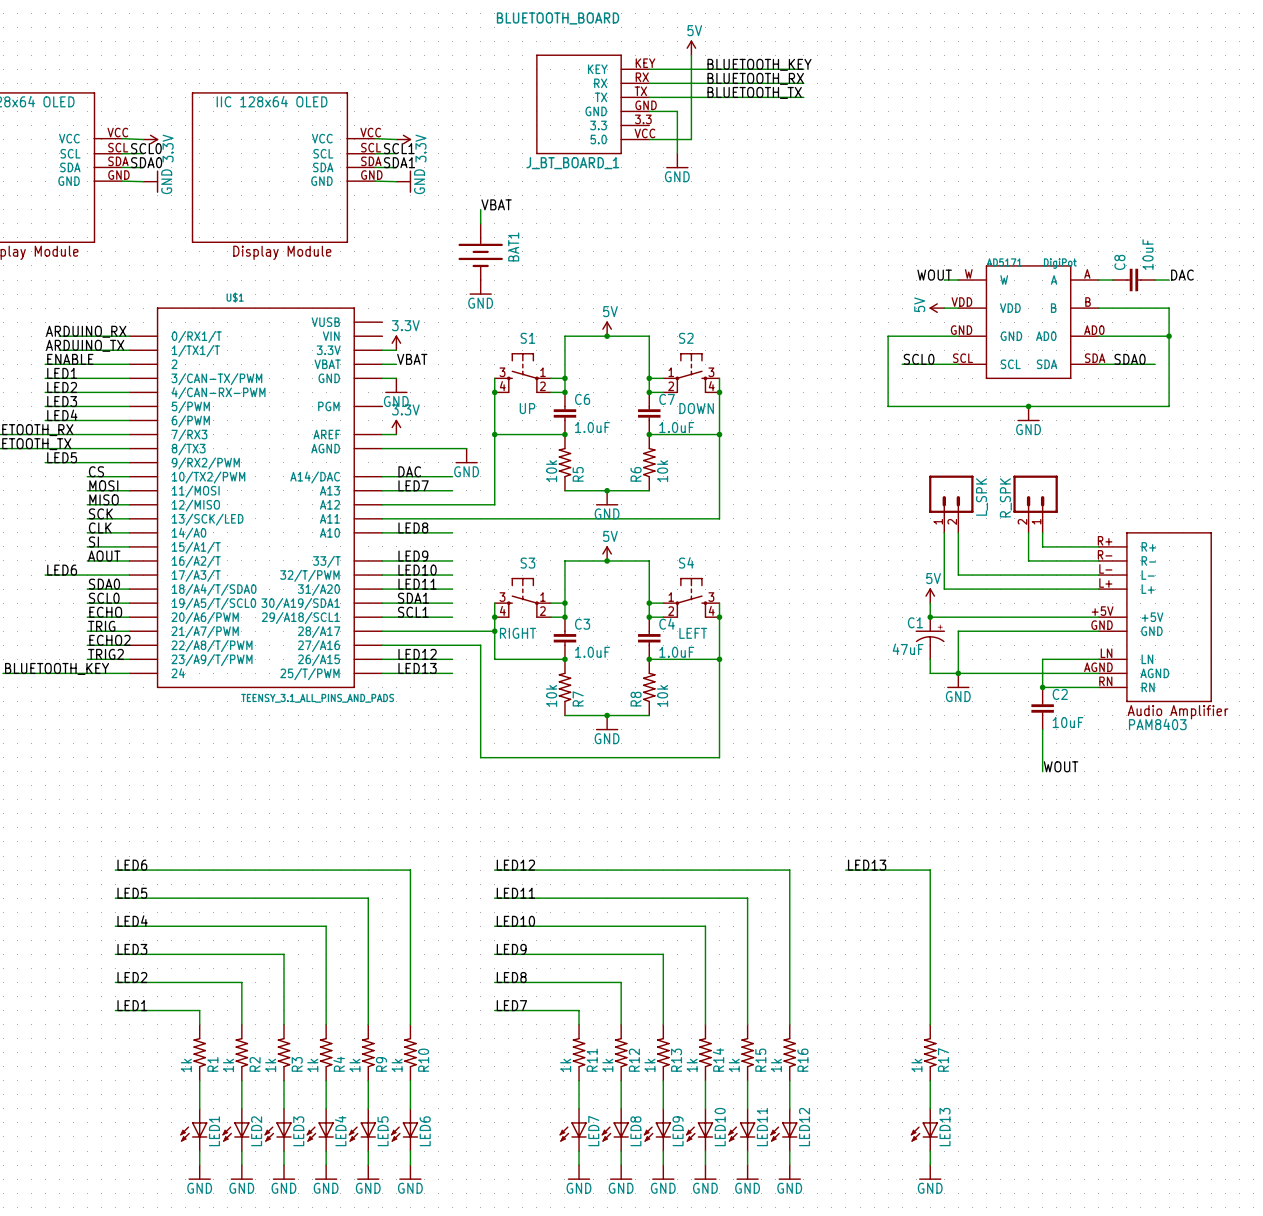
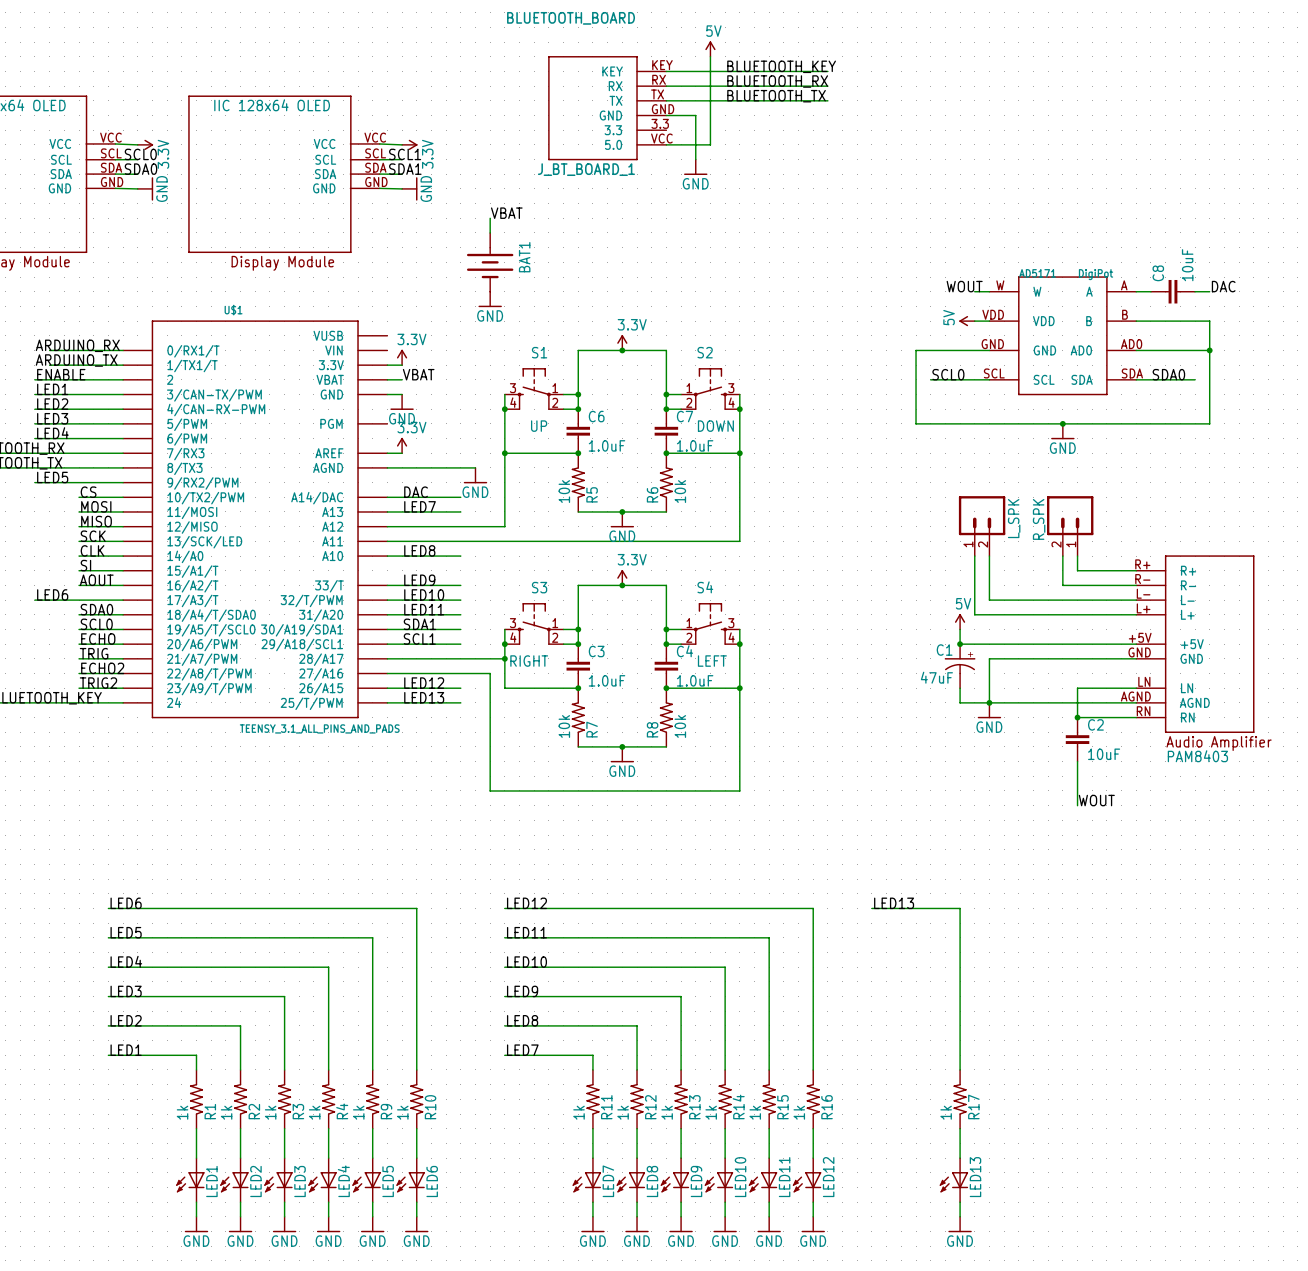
power symbol: 5V (607, 328) -> 3.3V (622, 342)
power symbol: 5V (607, 553) -> 3.3V (622, 577)

